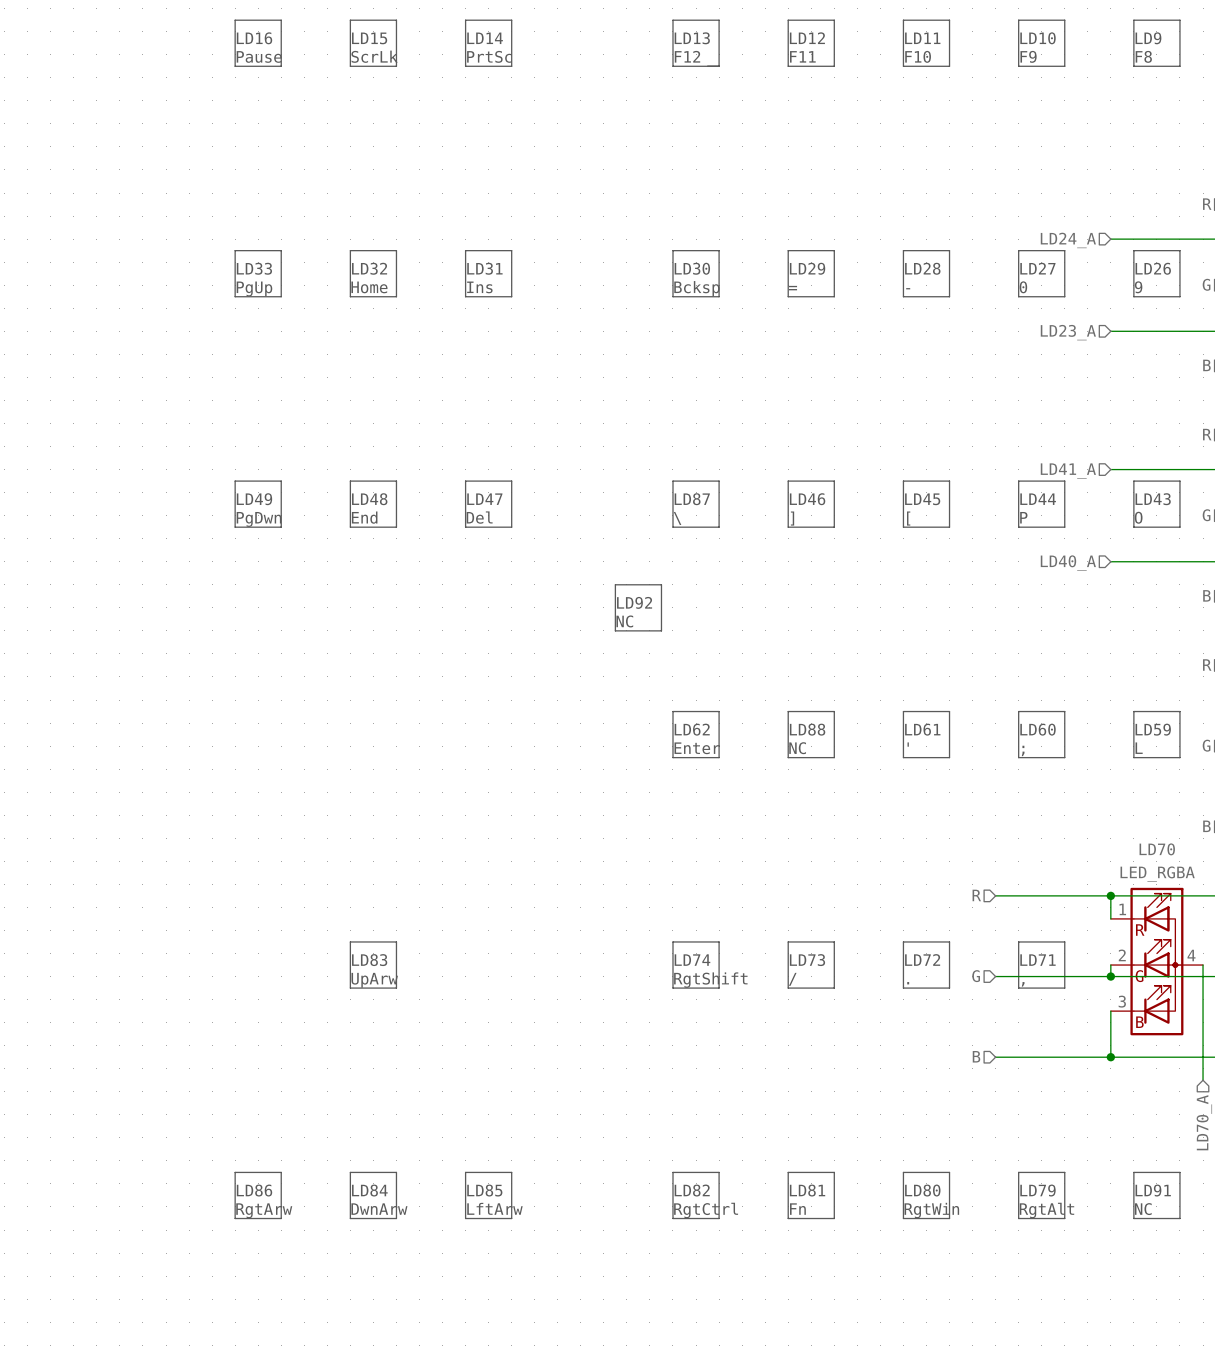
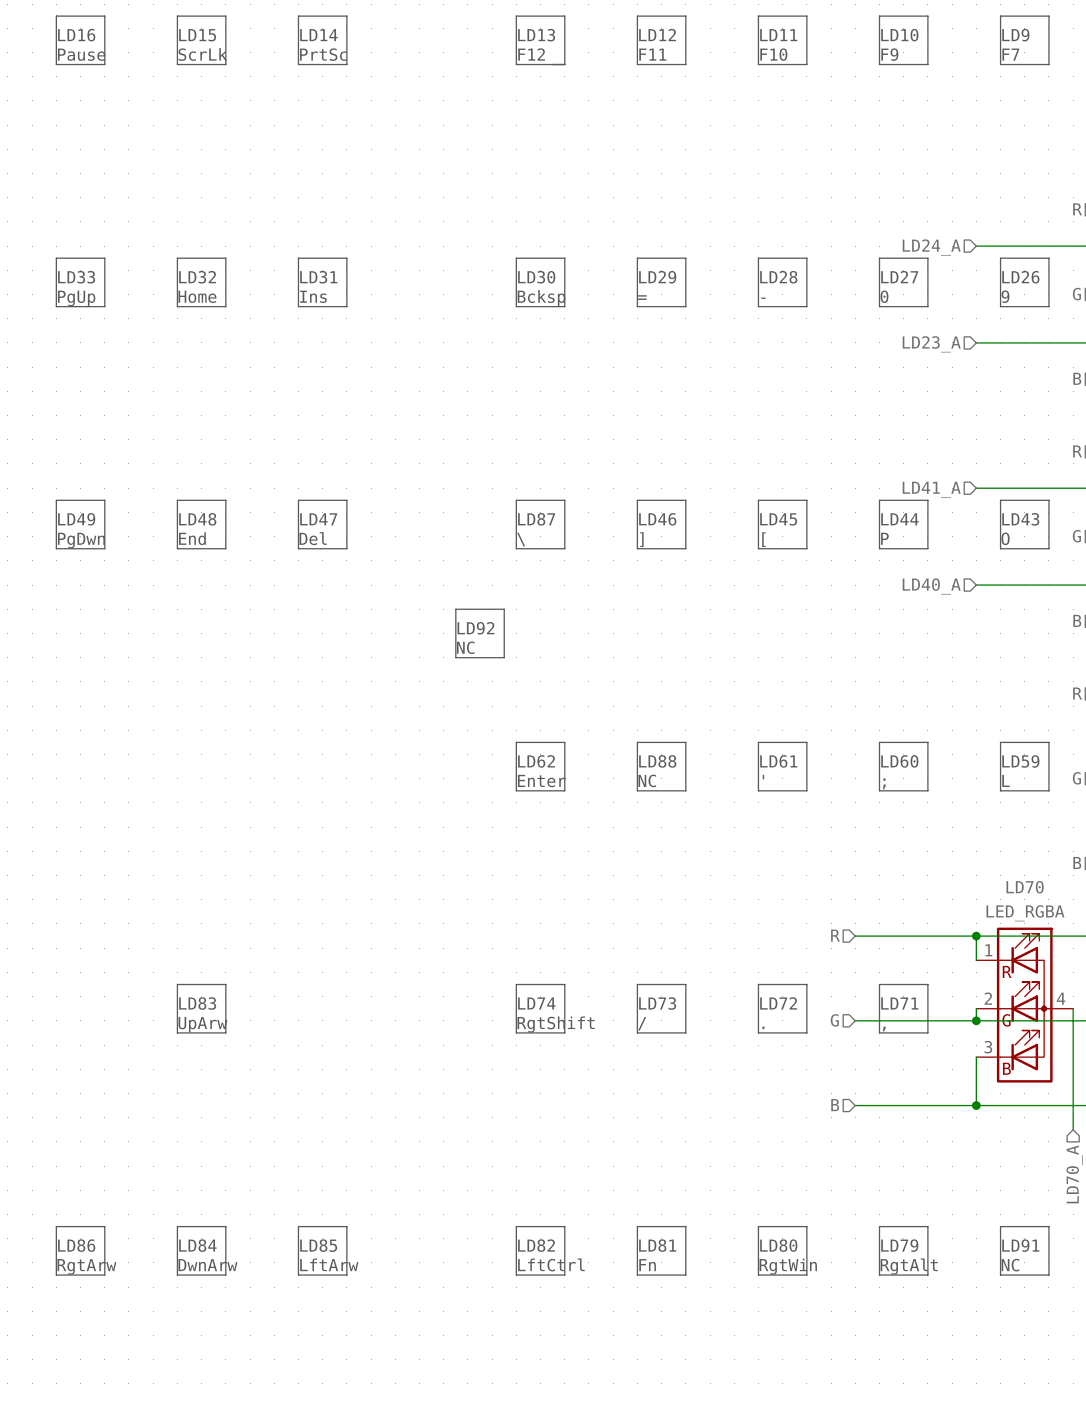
text: F8 (1143, 56) -> F7 (1010, 54)
text: RgtCtrl (706, 1210) -> LftCtrl (551, 1264)

